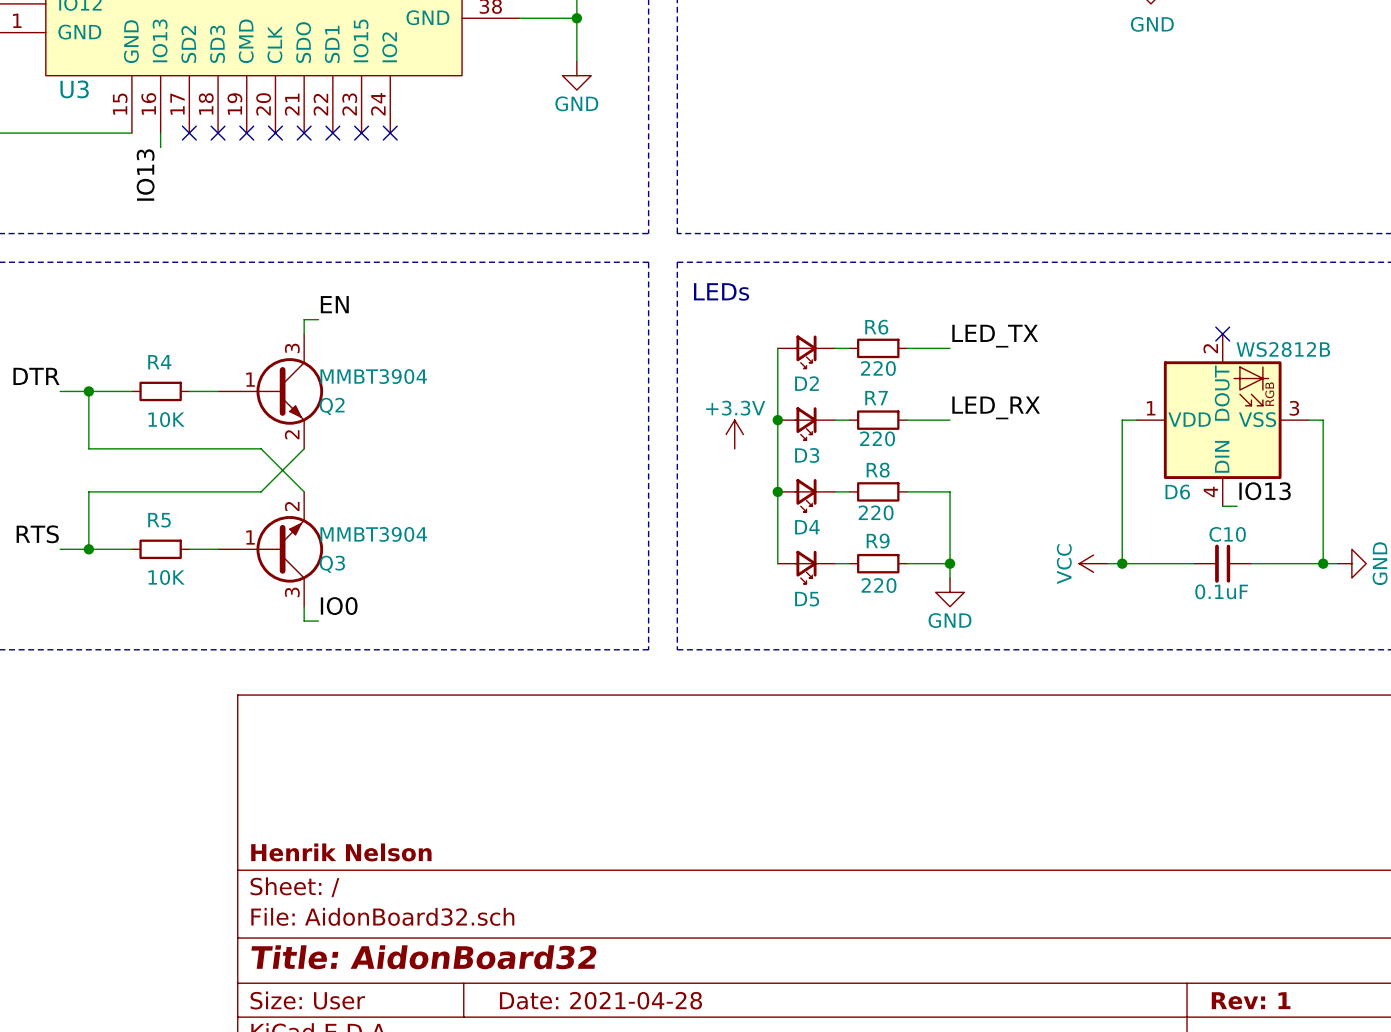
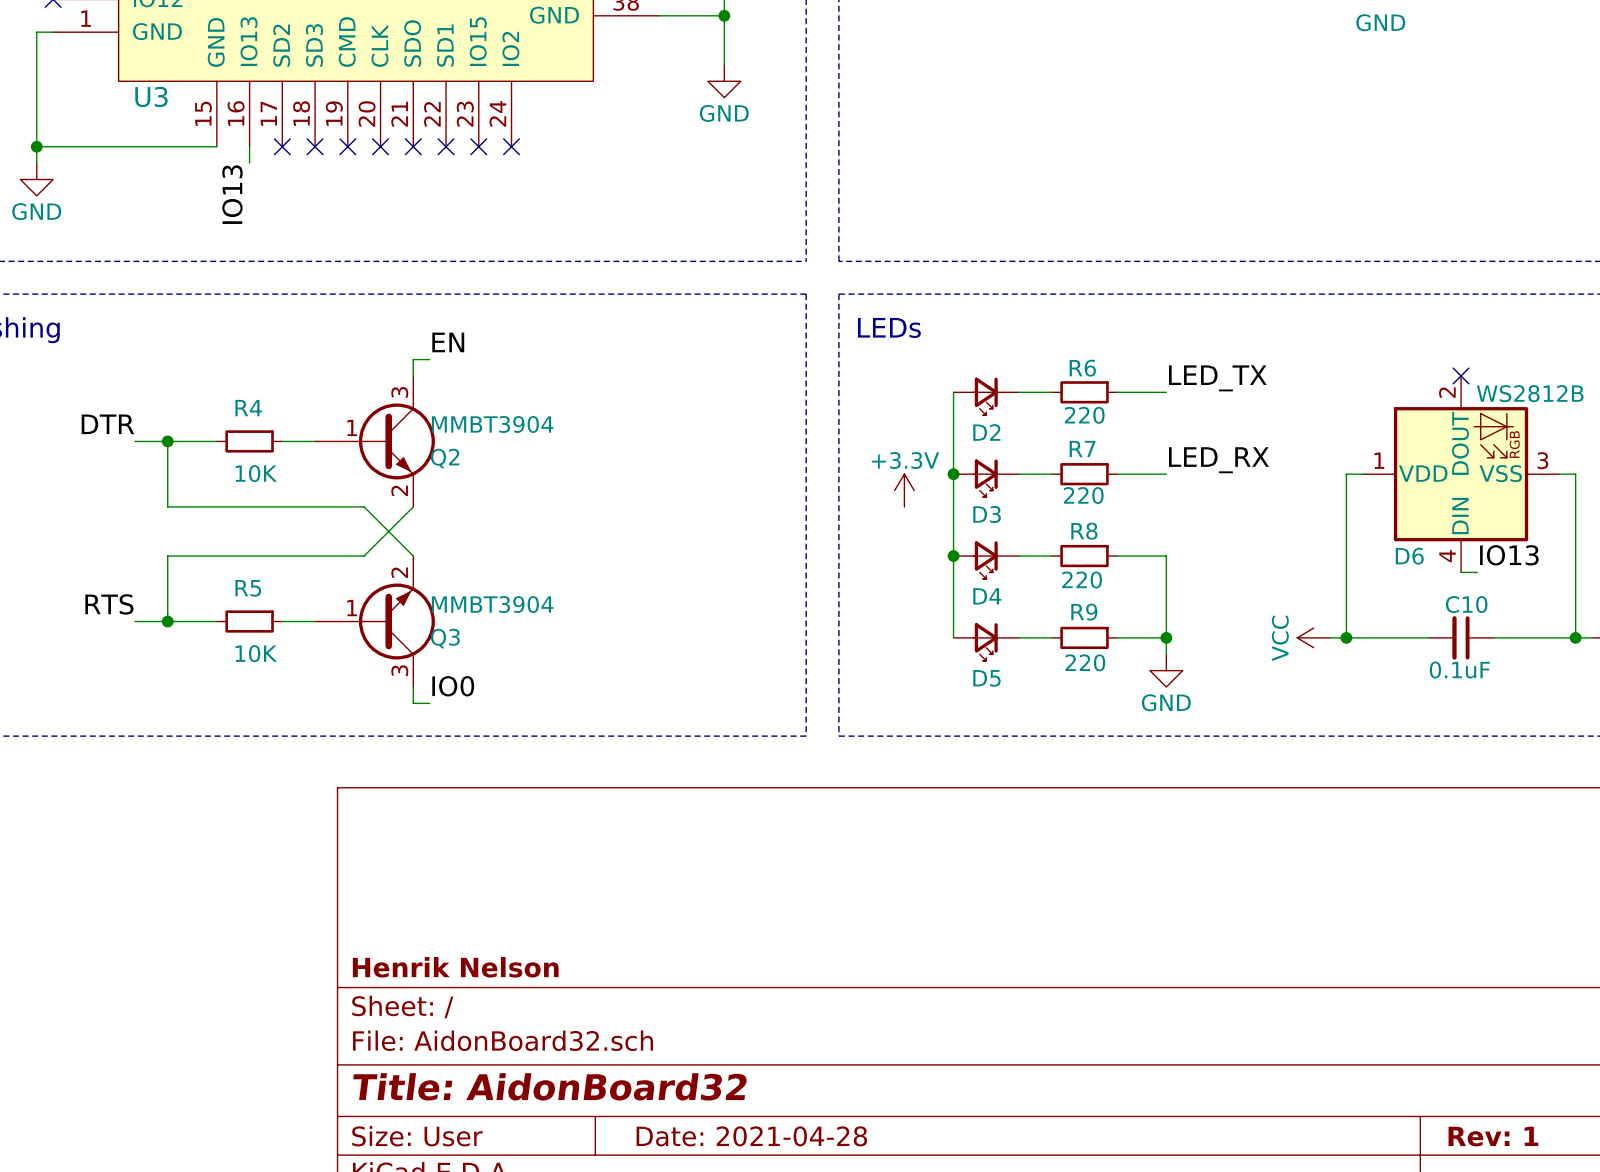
label position: LED_TX (995, 336) -> LED_TX (1217, 378)
R6 position: (878, 348) -> (1084, 392)
wire: none -> (1149, 392) (1166, 392)
label position: LED_RX (996, 407) -> LED_RX (1218, 460)
R7 position: (878, 420) -> (1084, 474)
wire: none -> (1149, 474) (1166, 474)
R8 position: (878, 491) -> (1084, 556)
wire: (950, 491) (950, 578) -> (1149, 556) (1166, 556) (1166, 654)
R9 position: (878, 563) -> (1084, 637)
wire: none -> (1149, 637) (1166, 637)
junction position: (950, 563) -> (1166, 637)
power symbol position: GND (950, 592) -> GND (1166, 670)

